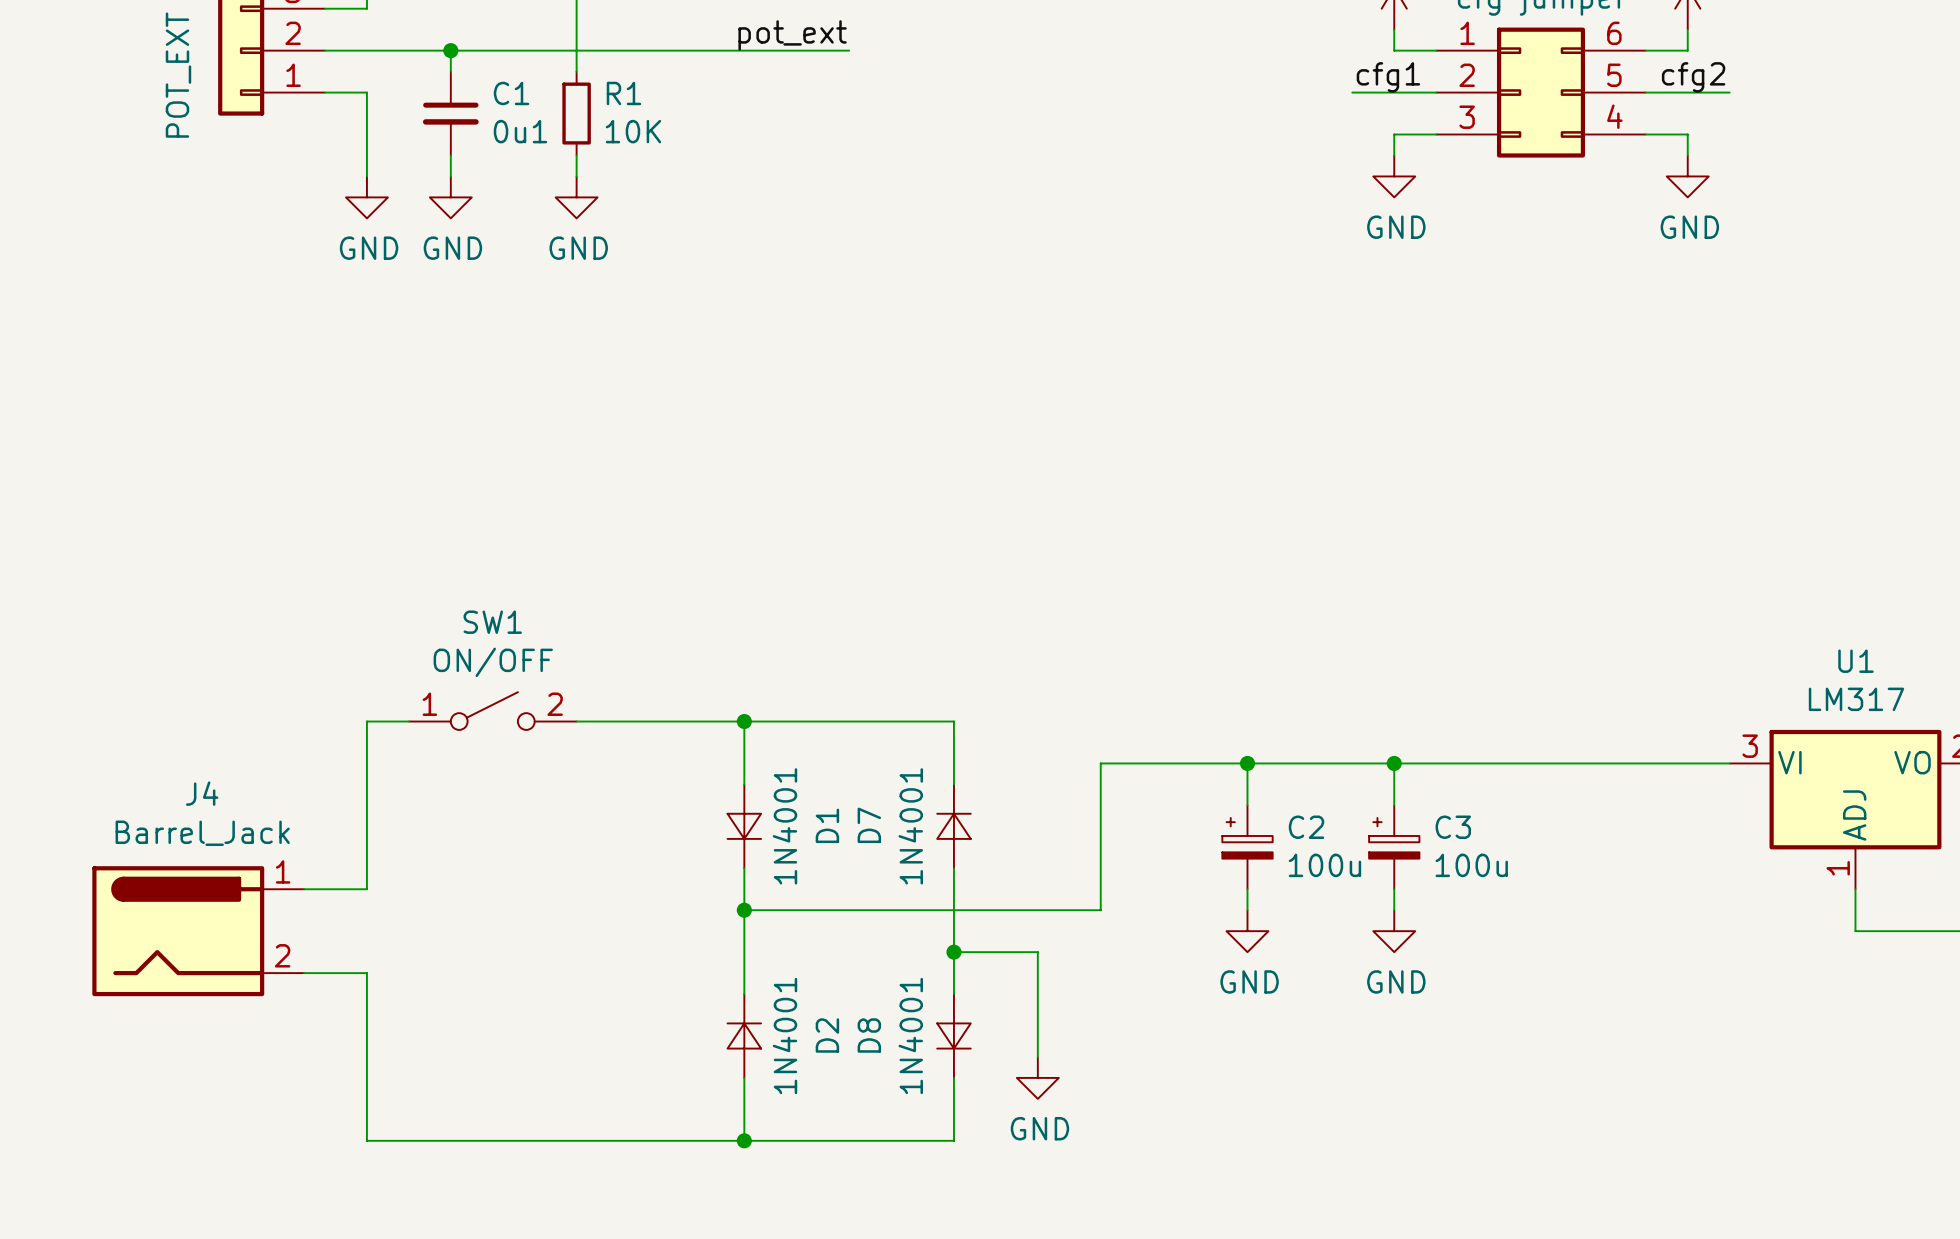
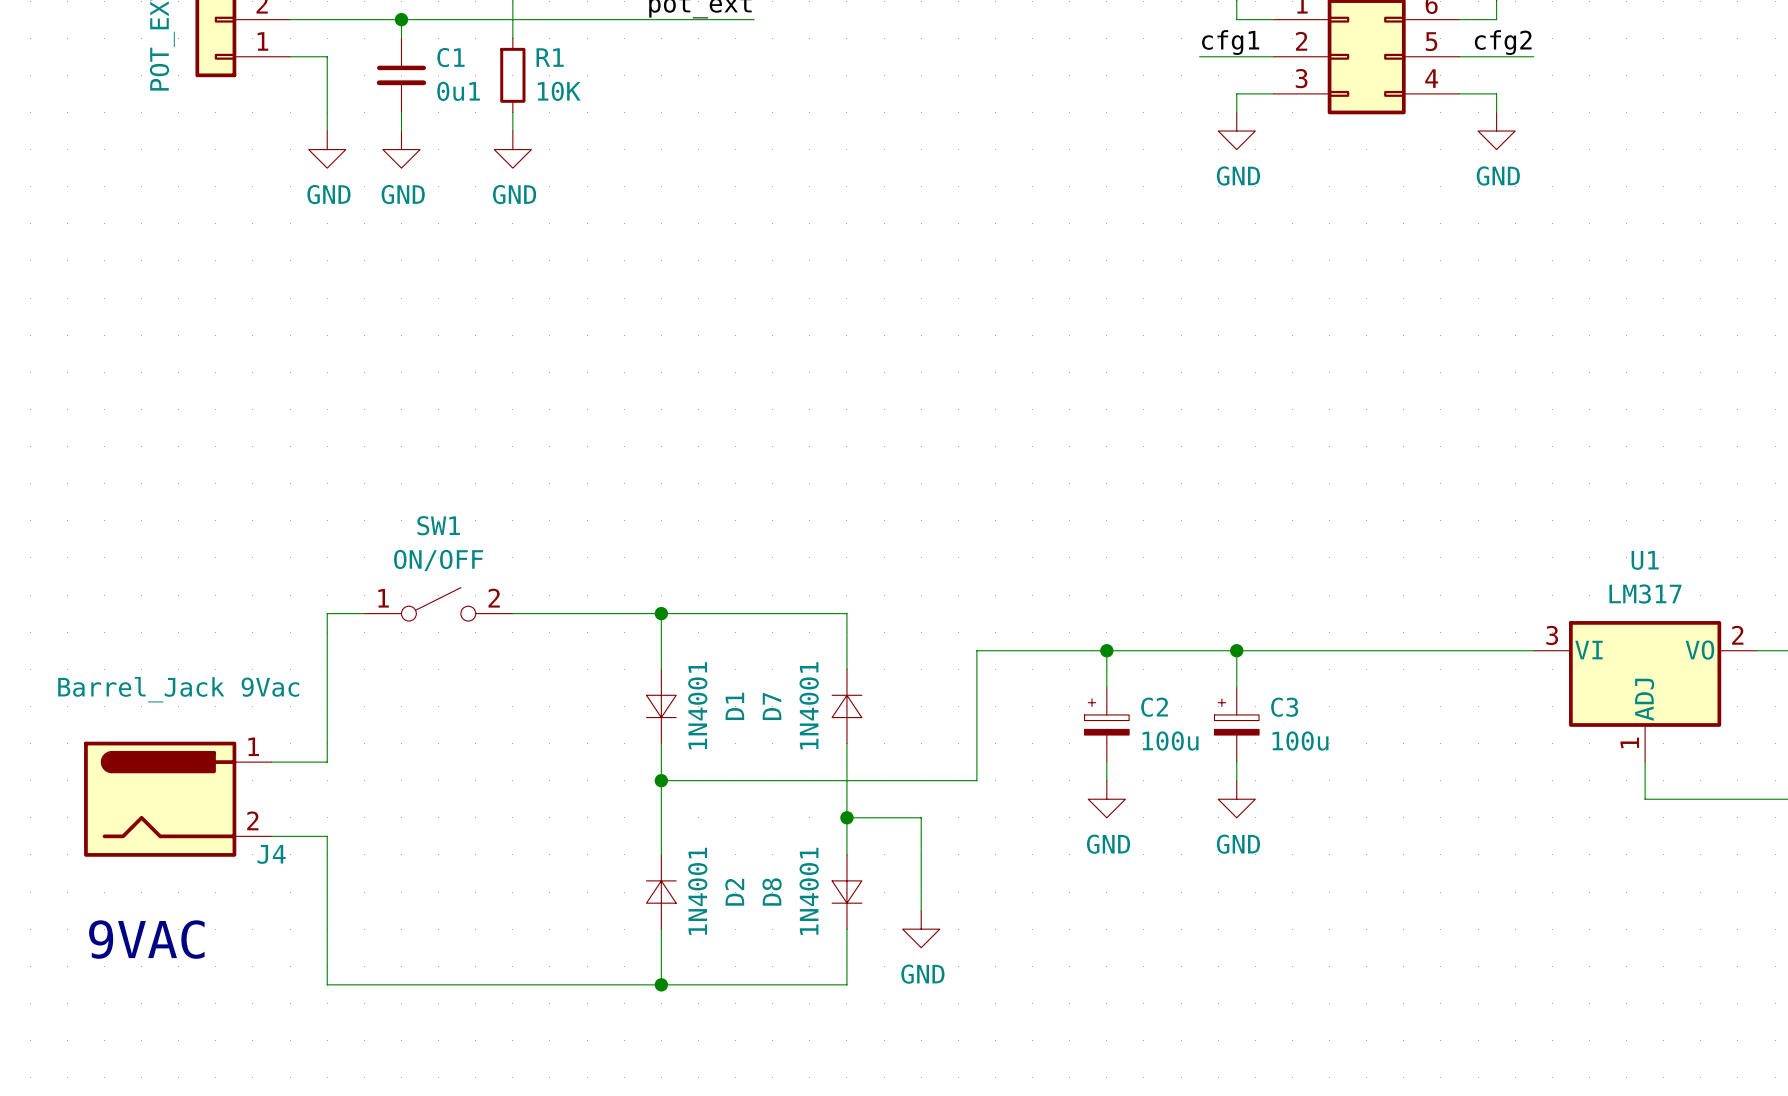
J4 name position: J4 (202, 793) -> J4 (271, 854)
J4 value: Barrel_Jack (202, 833) -> Barrel_Jack 9Vac (178, 689)
text: none -> 9VAC (146, 939)

